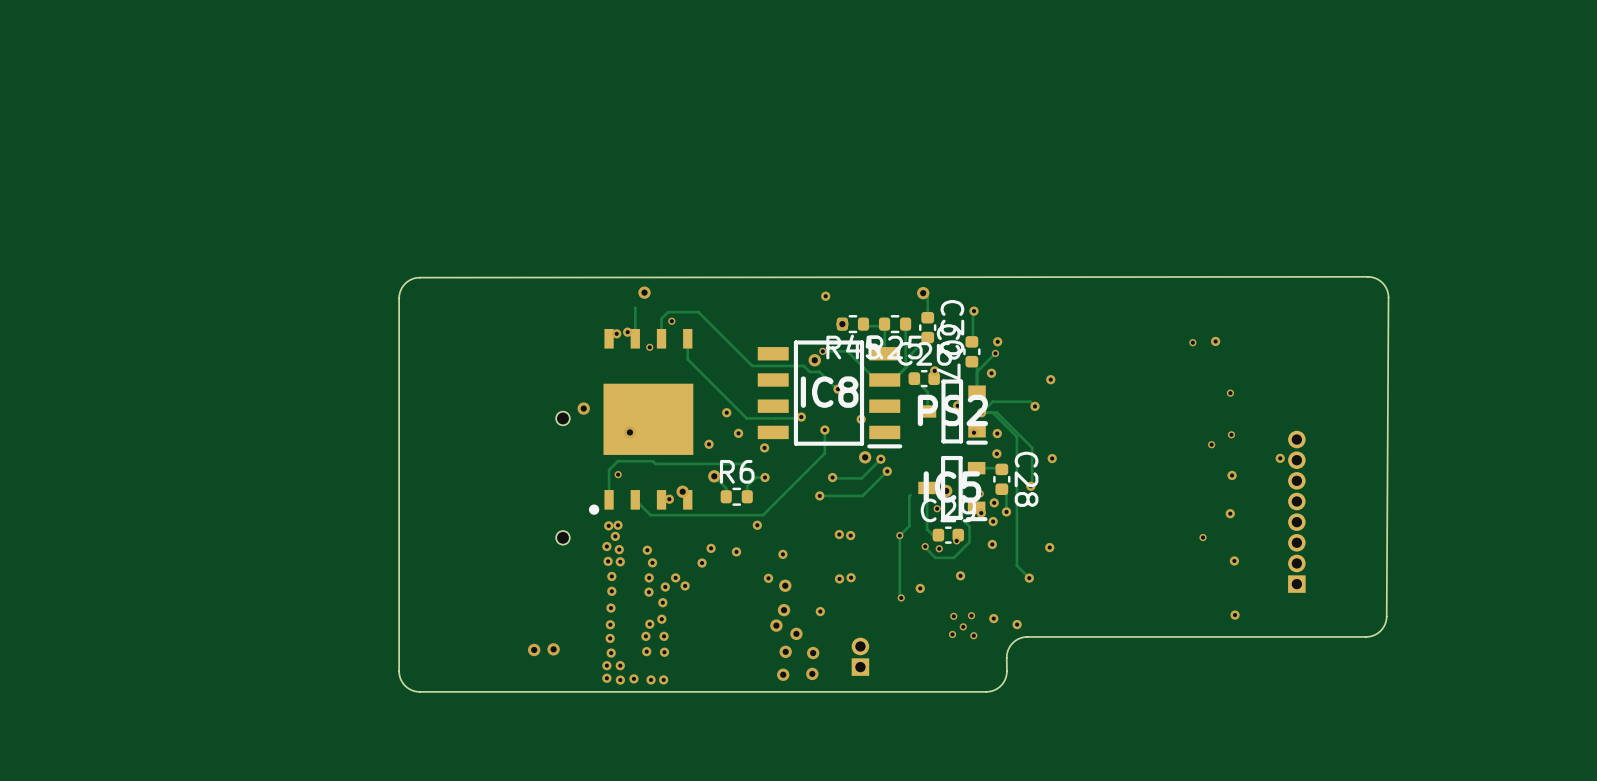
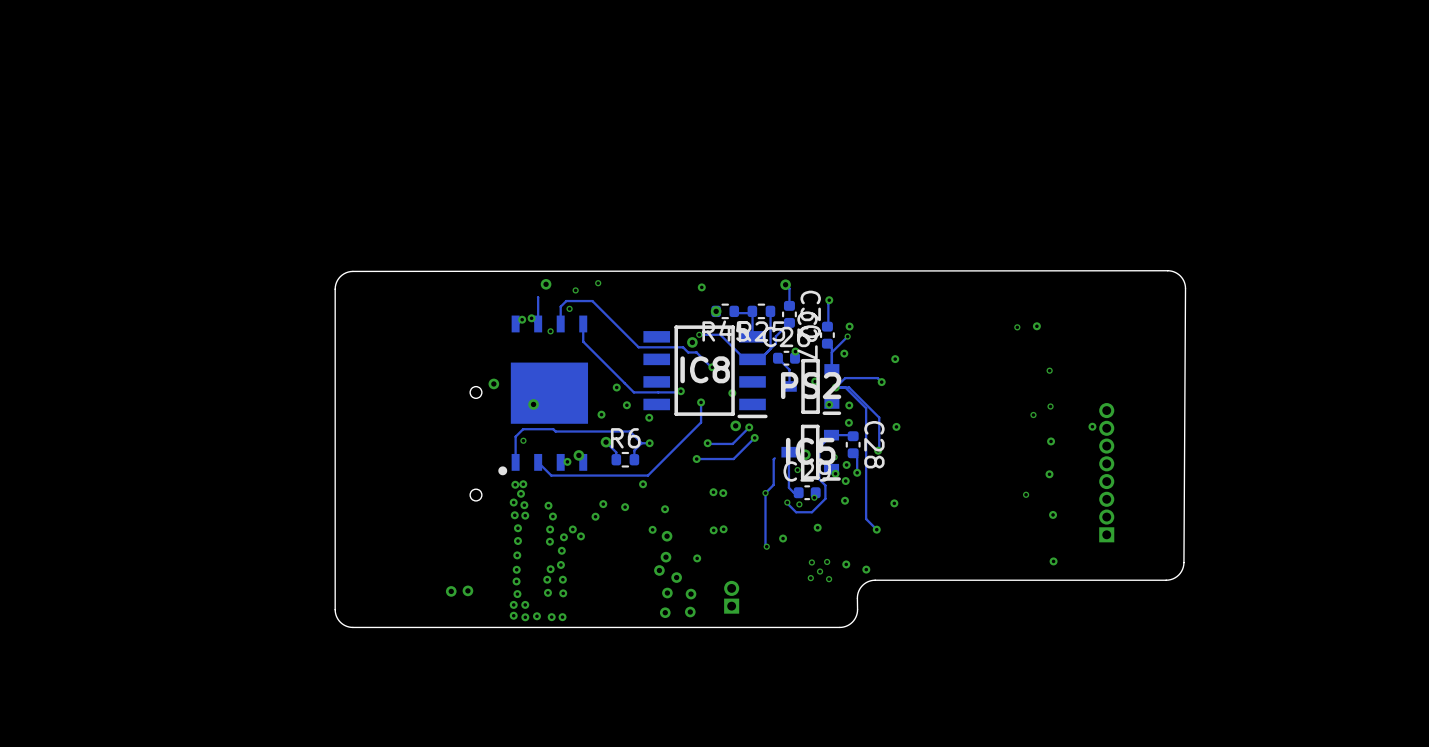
via: none -> (598, 283)
via: none -> (575, 290)

